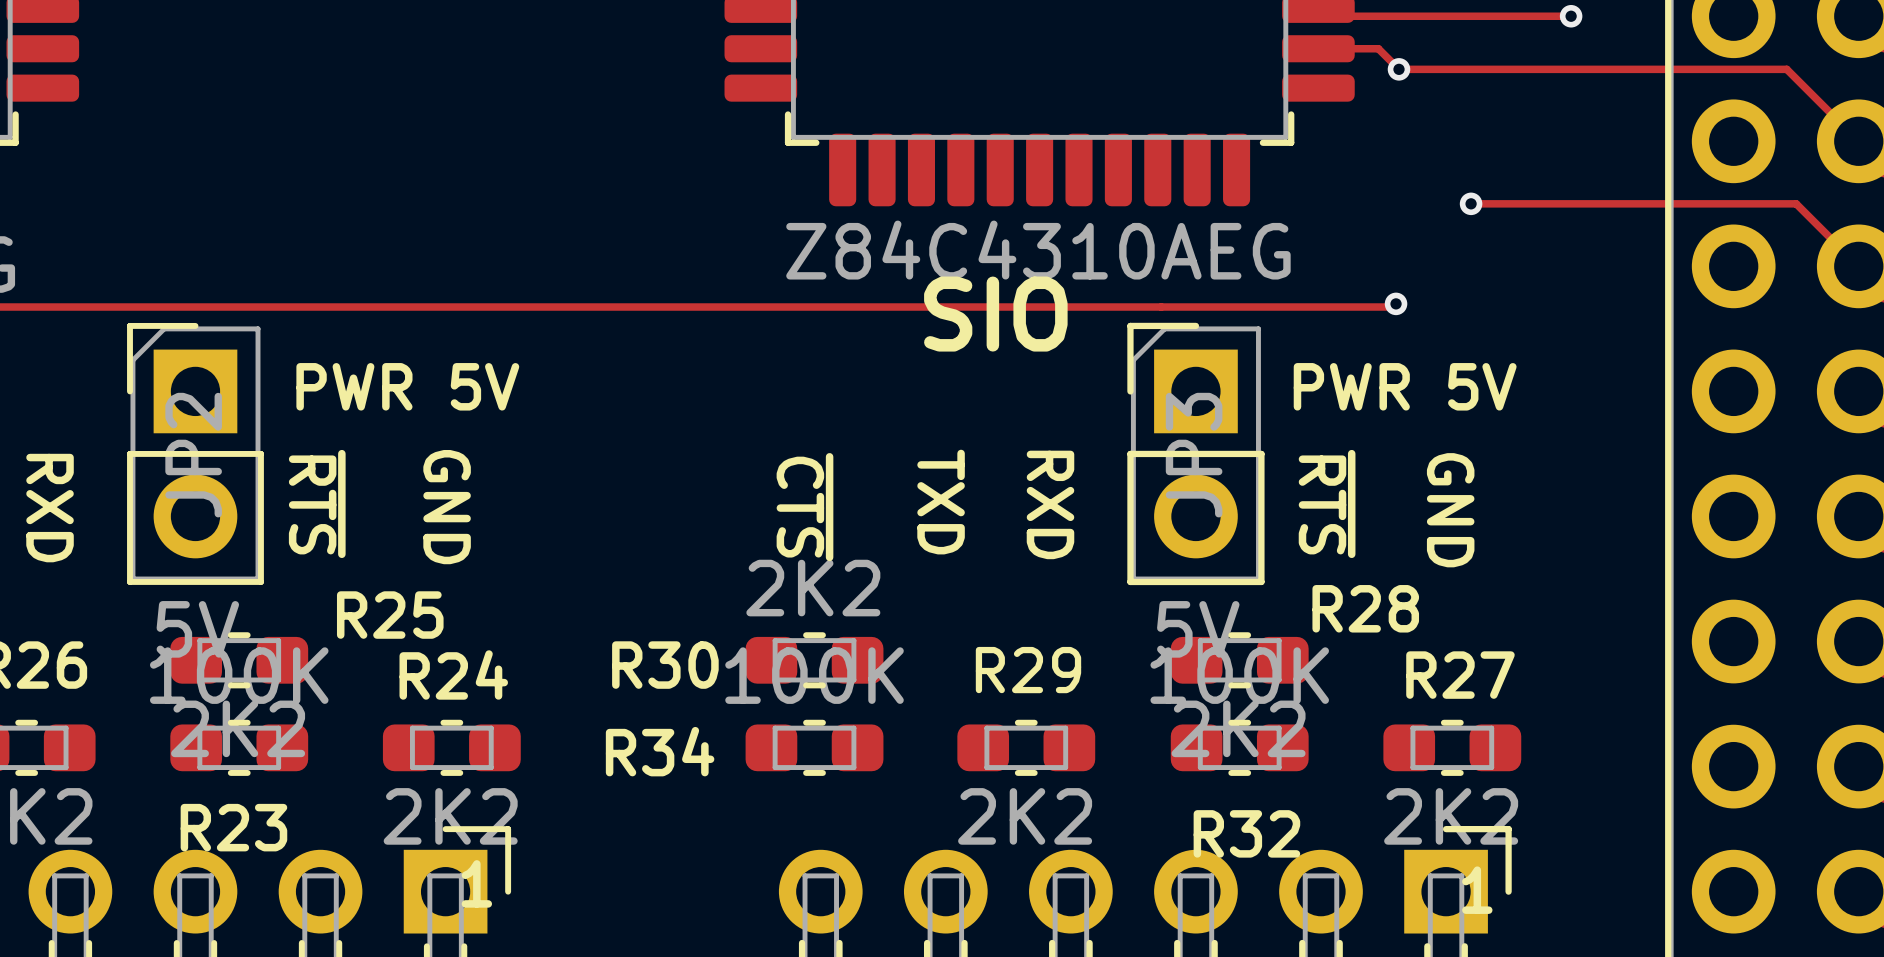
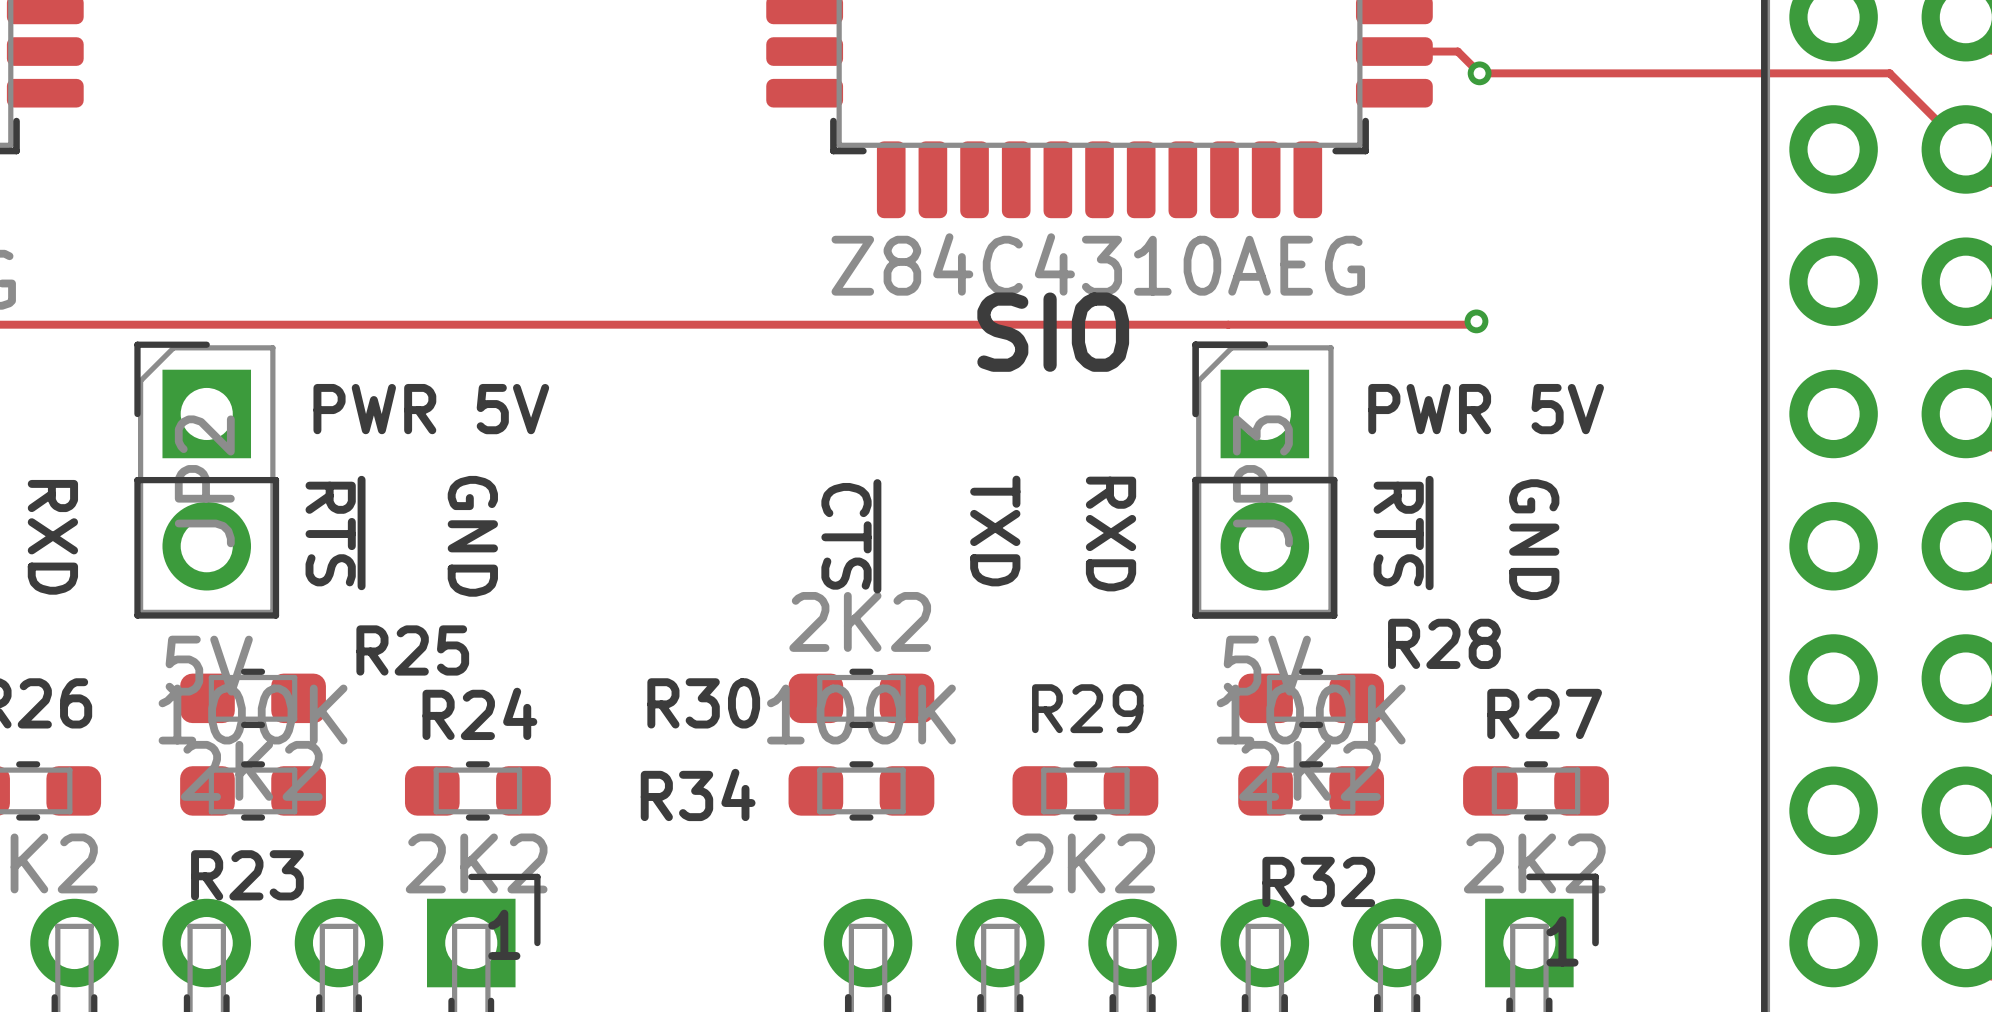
track: (1318, 9) (1325, 16) (1571, 16) -> none
via: (1571, 16) -> none
track: (1471, 203) (1796, 203) (1858, 266) -> none
via: (1471, 203) -> none

